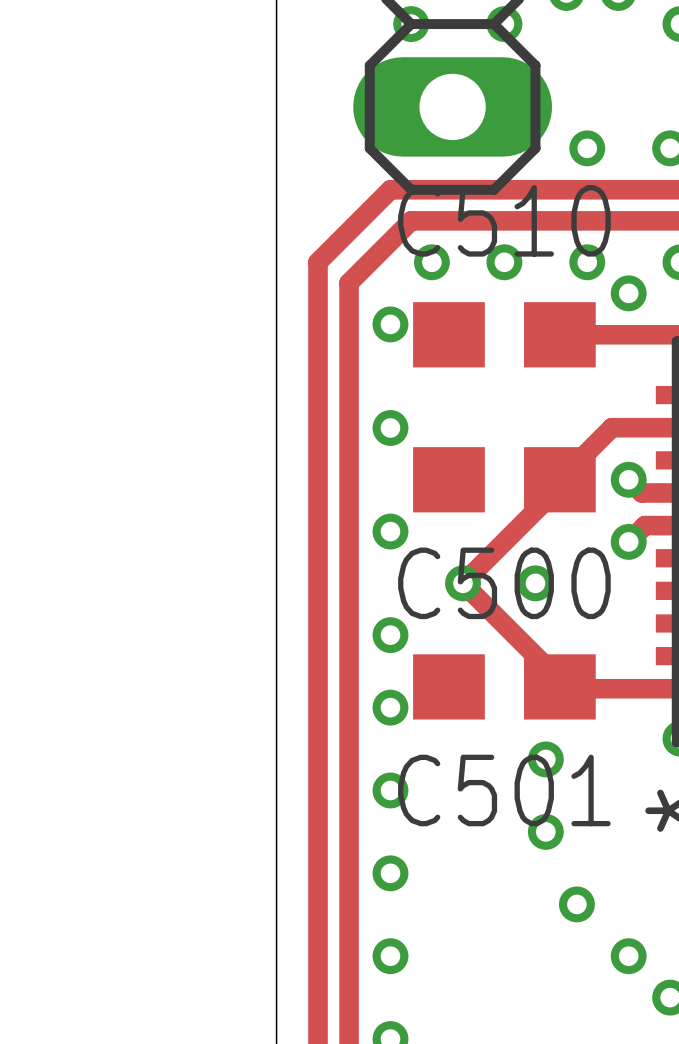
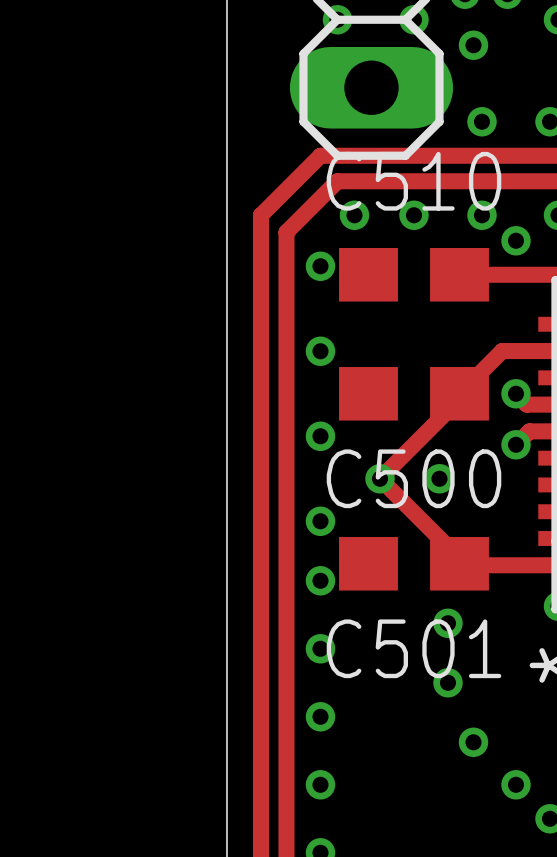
via: none -> (473, 45)

